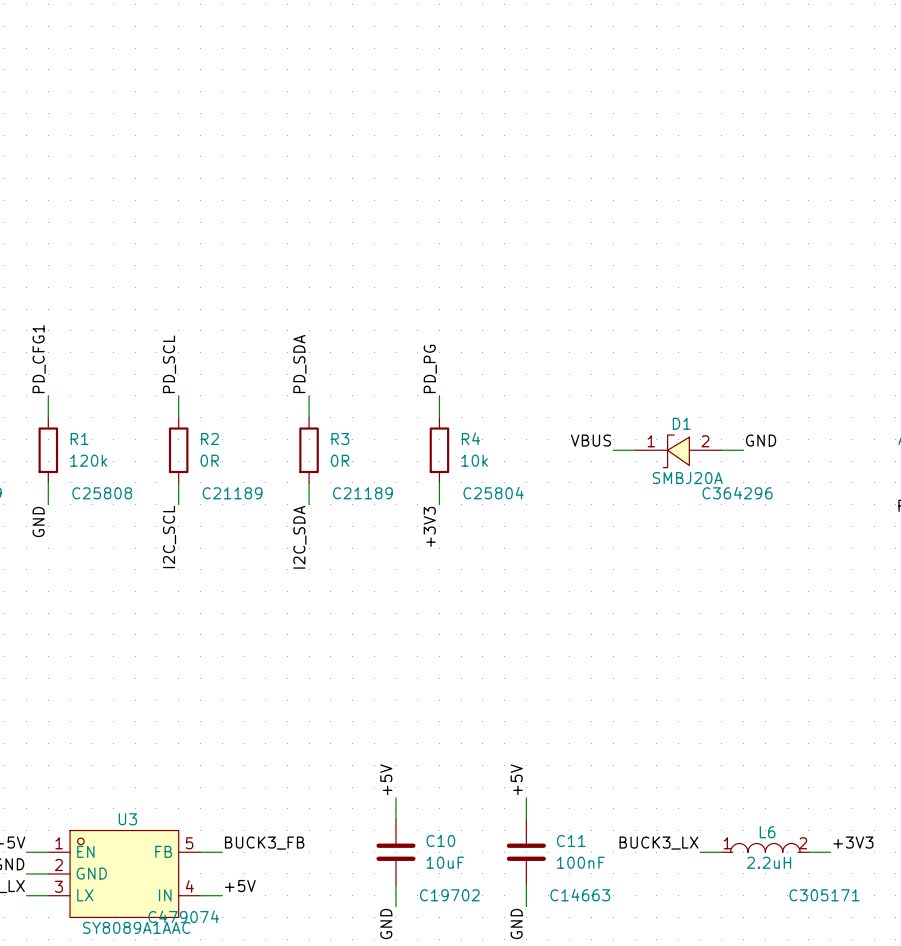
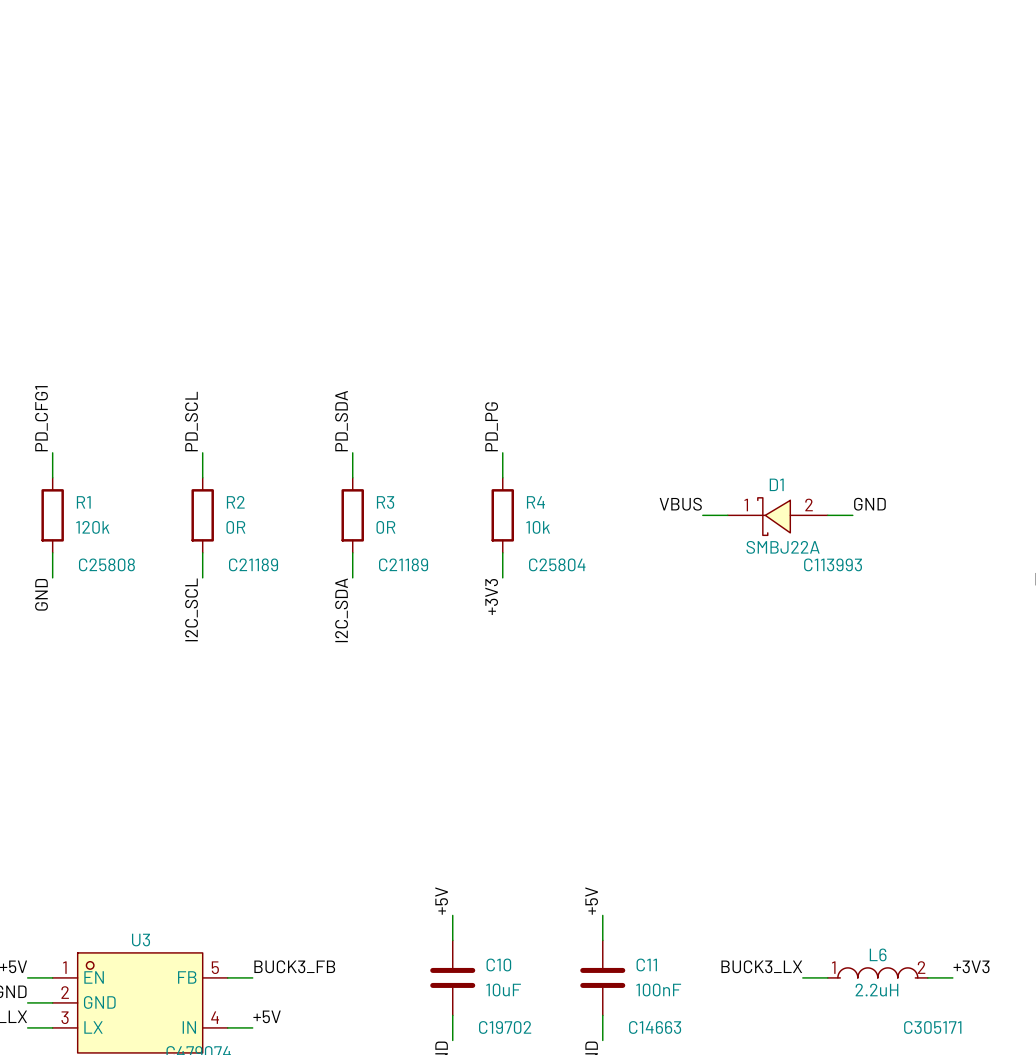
D1 symbol: [635, 435, 722, 468] -> [727, 497, 828, 536]
D1 value: SMBJ20A (687, 478) -> SMBJ22A (783, 547)
D1 text: C364296 (737, 493) -> C113993 (833, 564)

